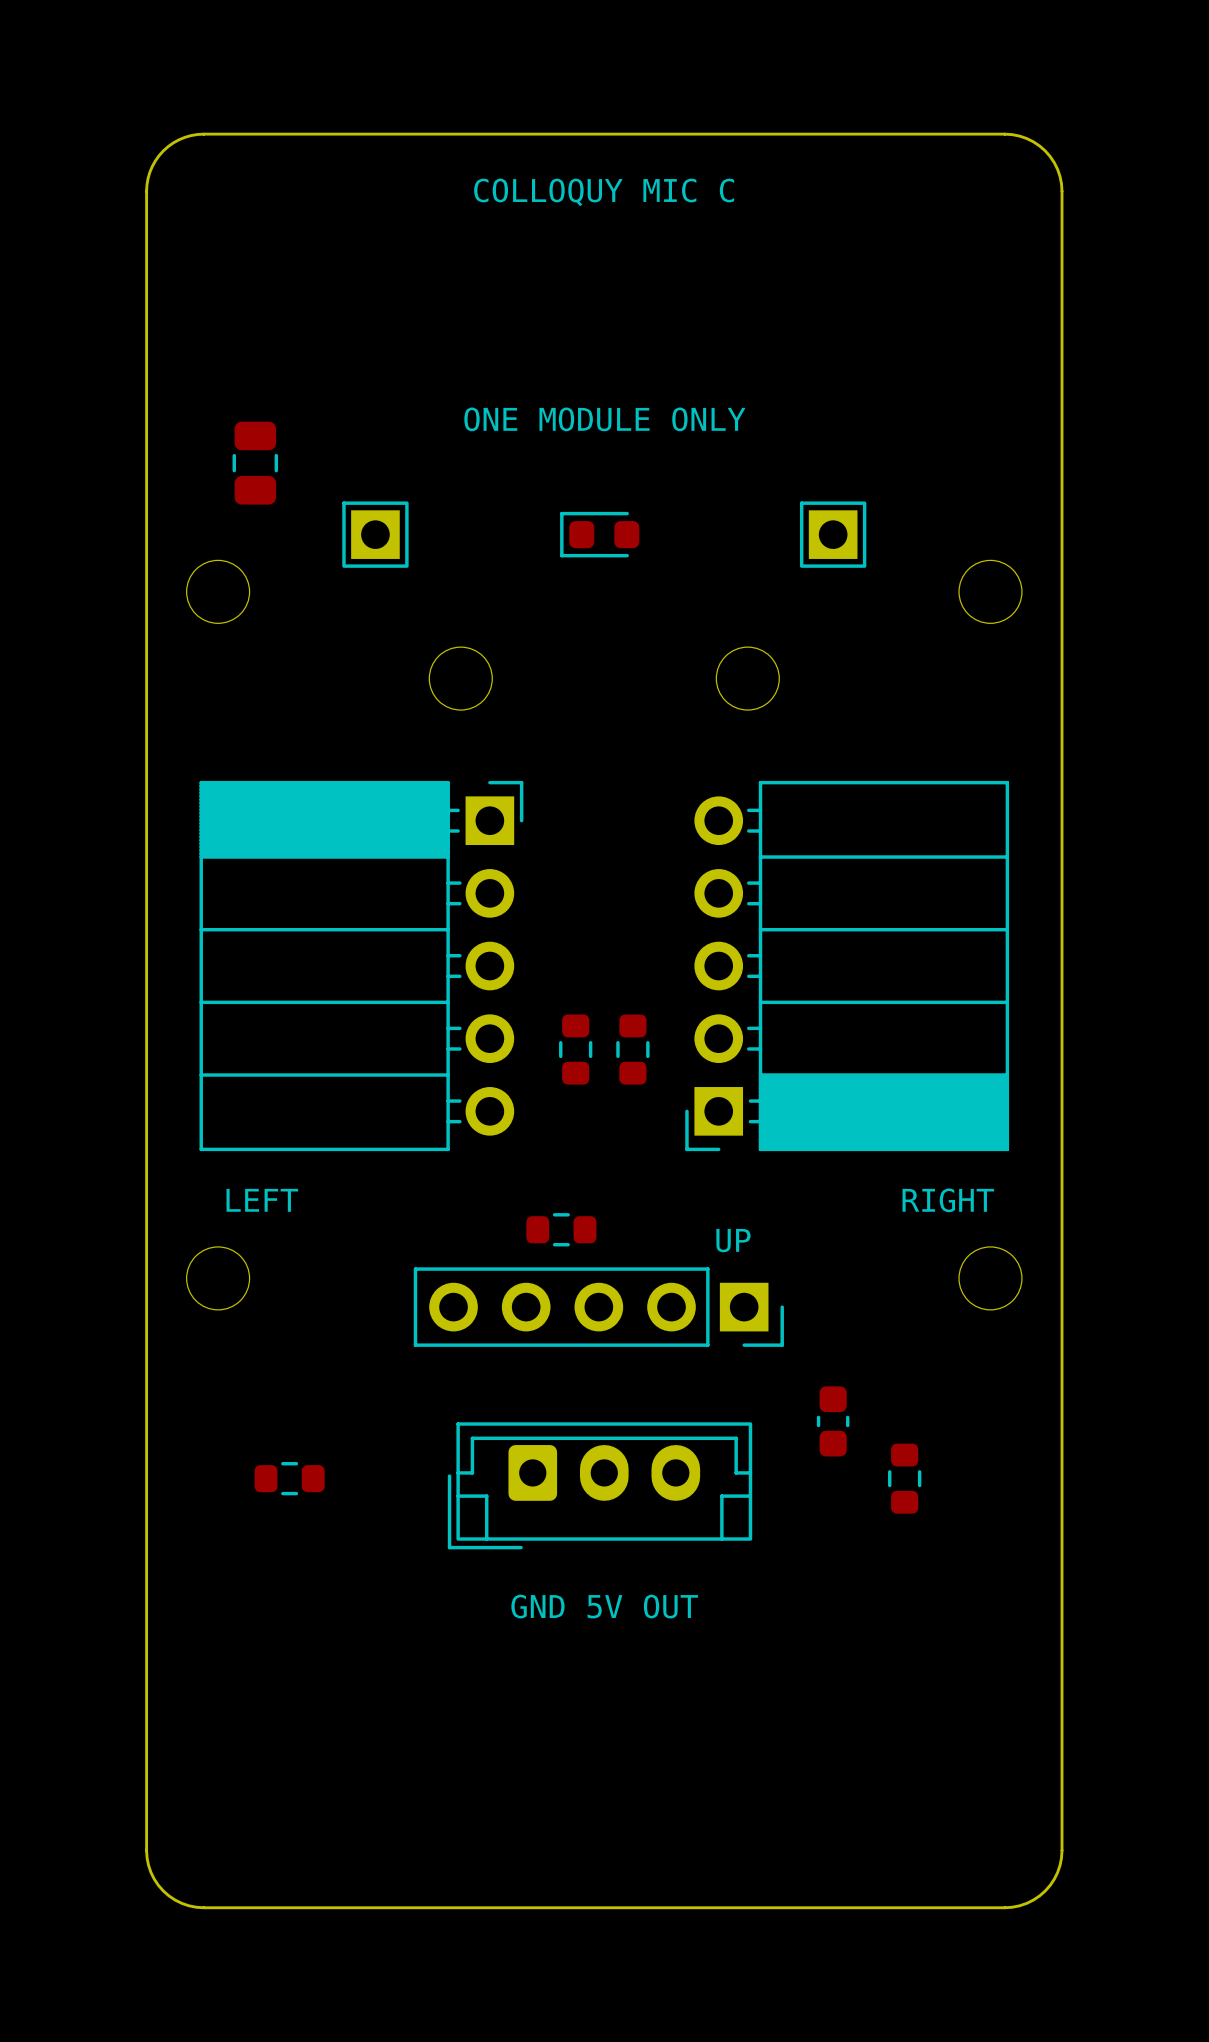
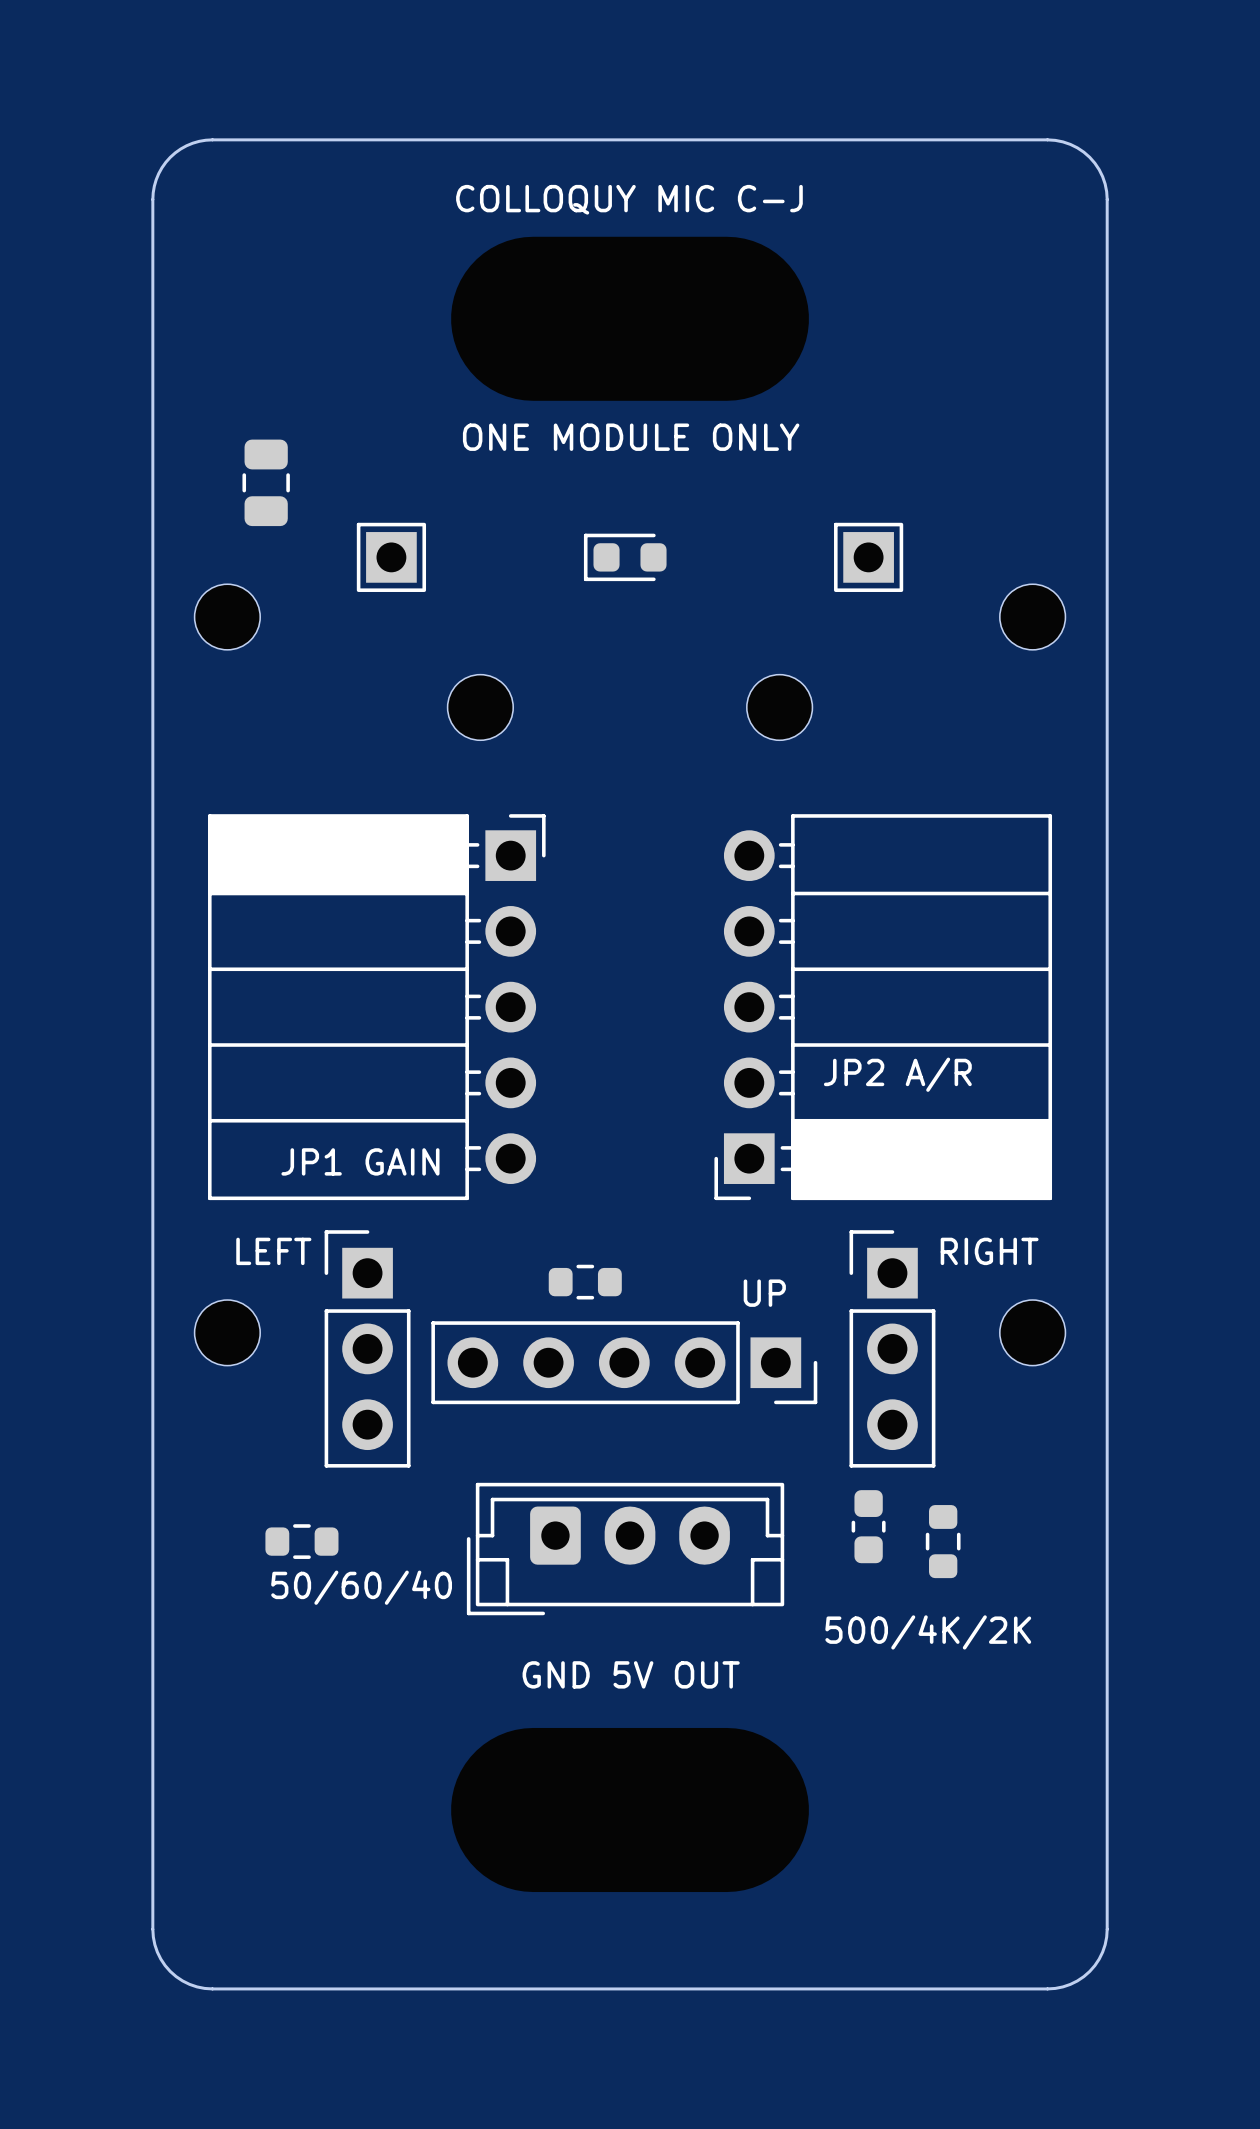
text: COLLOQUY MIC C (604, 192) -> COLLOQUY MIC C-J (629, 199)
text: none -> JP2 A/R (897, 1074)
part: (575, 1049) -> none
part: (632, 1049) -> none
text: none -> JP1 GAIN (360, 1161)
part: none -> (367, 1348)
part: none -> (892, 1348)
part position: (833, 1421) -> (868, 1526)
text: none -> 50/60/40 (361, 1587)
text: none -> 500/4K/2K (928, 1632)

